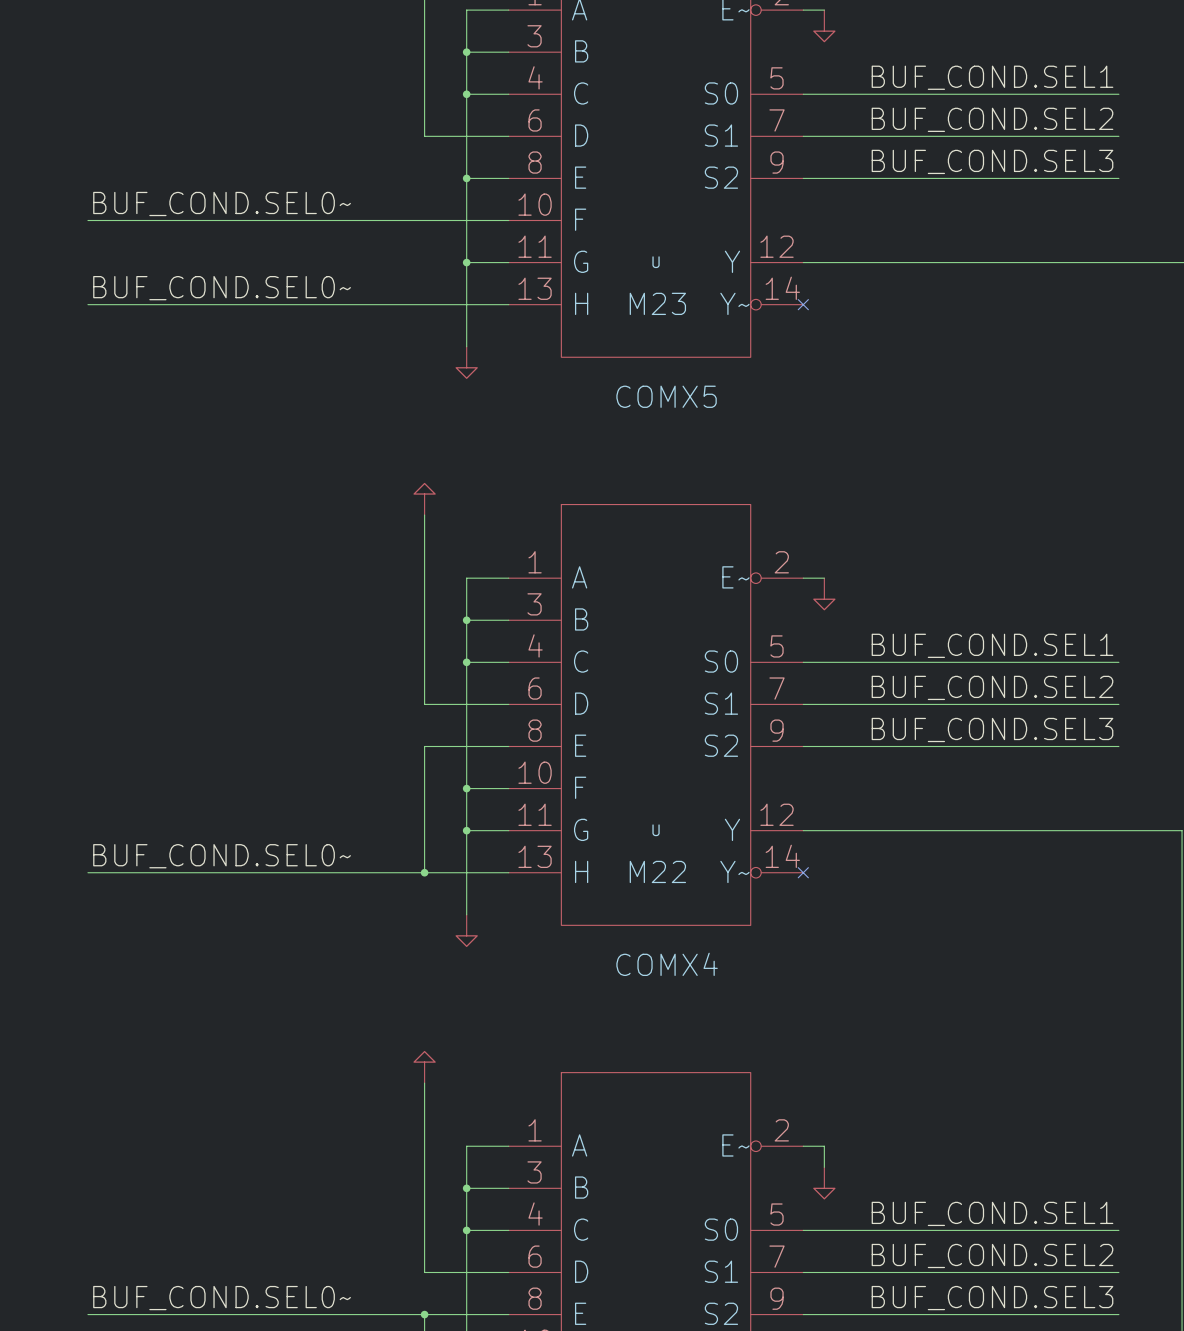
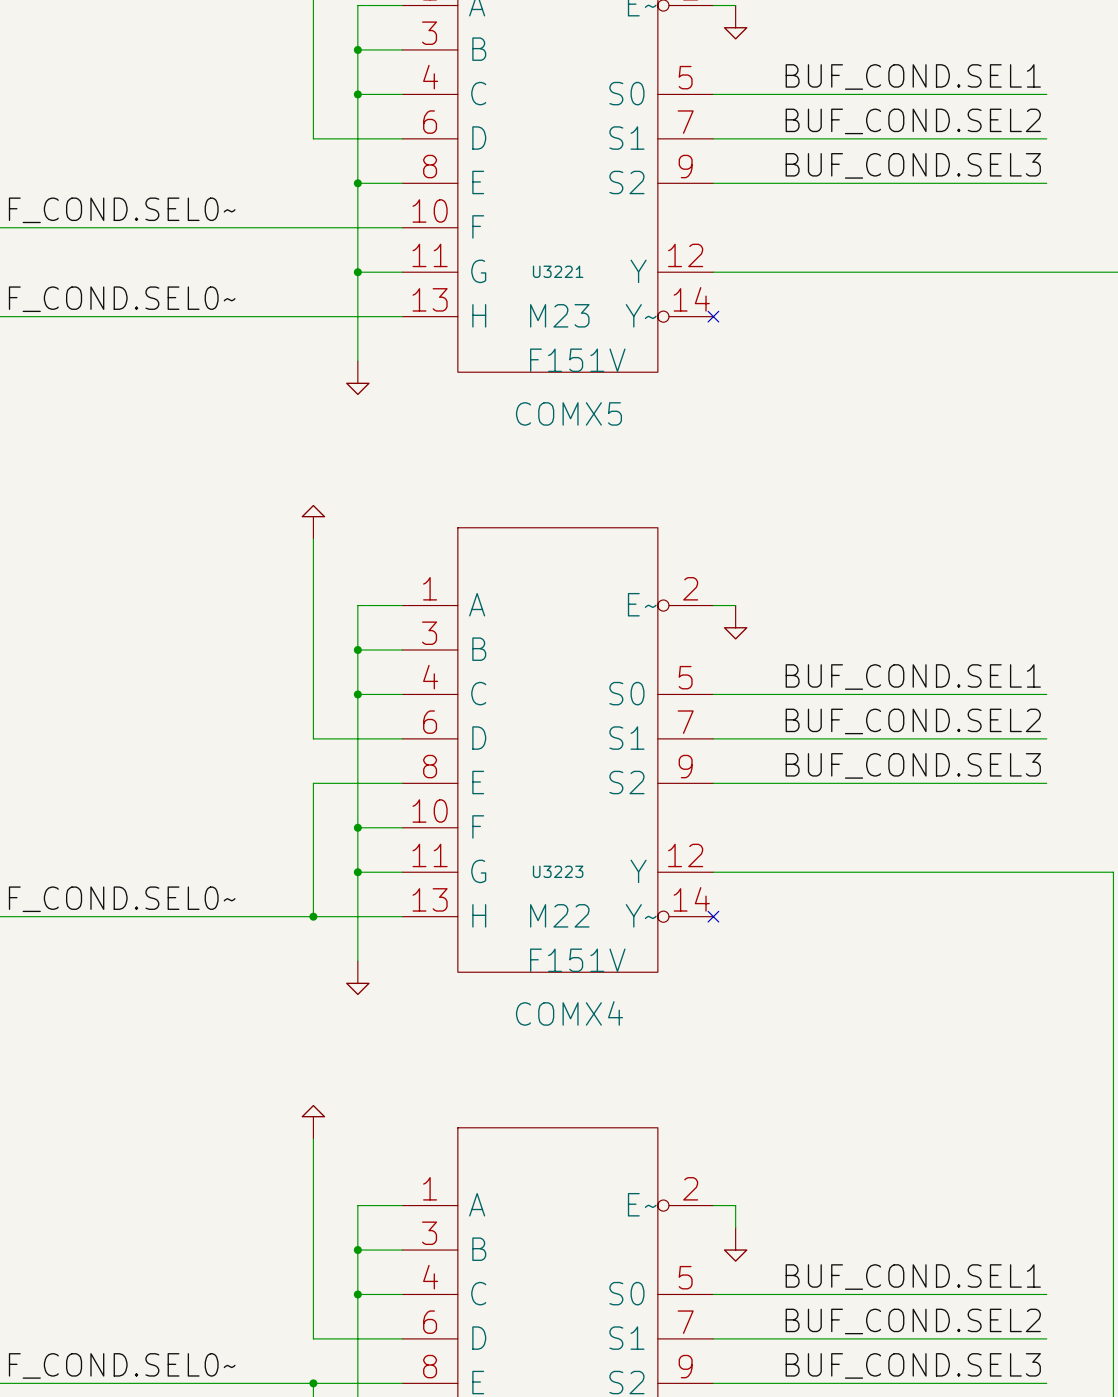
U name: U (656, 262) -> U3221 (558, 271)
U value: none -> F151V (577, 360)
U name: U (656, 830) -> U3223 (558, 871)
U value: none -> F151V (577, 960)

